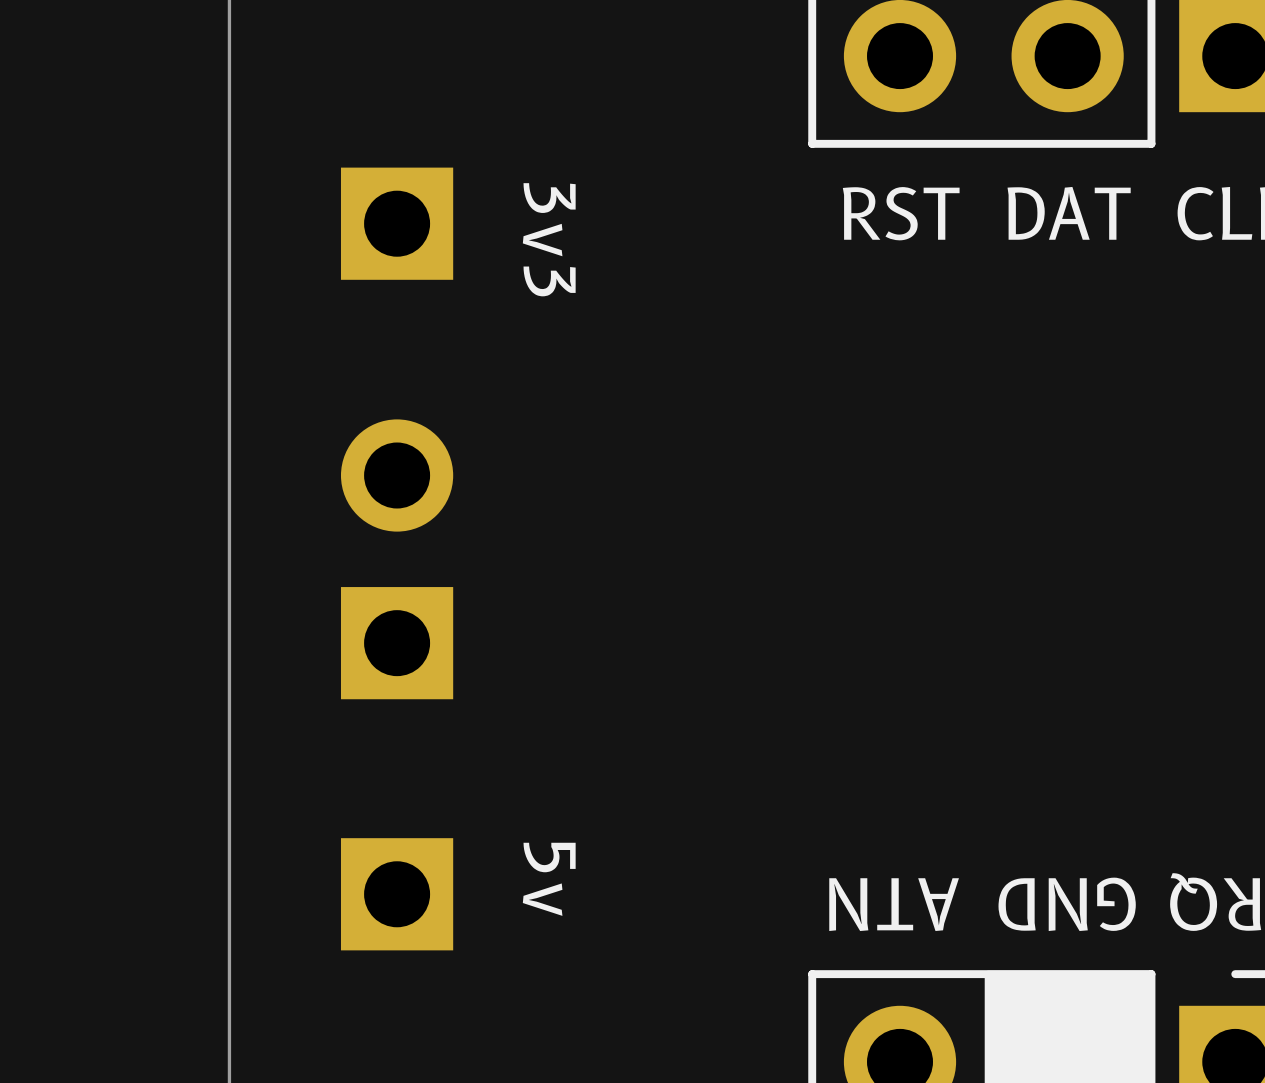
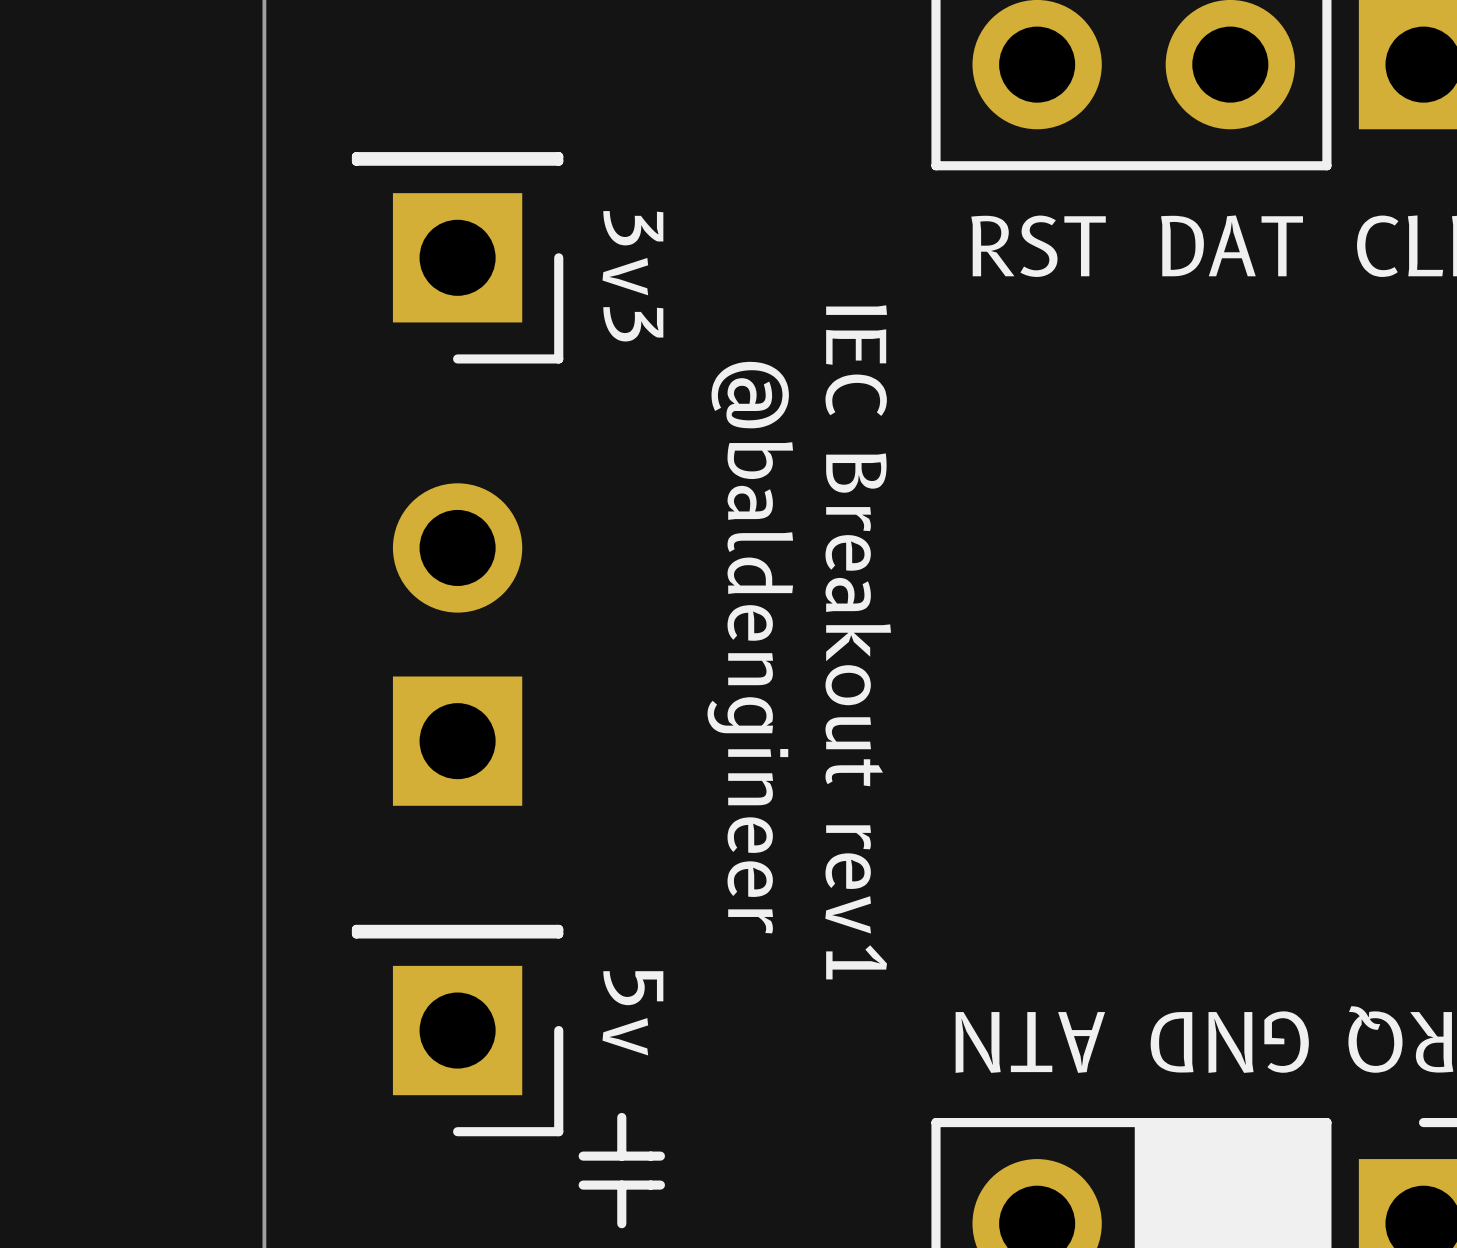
part side: top (397, 223) -> bottom (457, 257)
text: none -> IEC Breakout rev1 (858, 642)
text: none -> @baldengineer (750, 647)
part side: top (397, 894) -> bottom (457, 1030)
line: none -> (621, 1117) (621, 1156)
line: none -> (660, 1156) (583, 1156)
line: none -> (621, 1185) (621, 1223)
line: none -> (660, 1185) (583, 1185)

